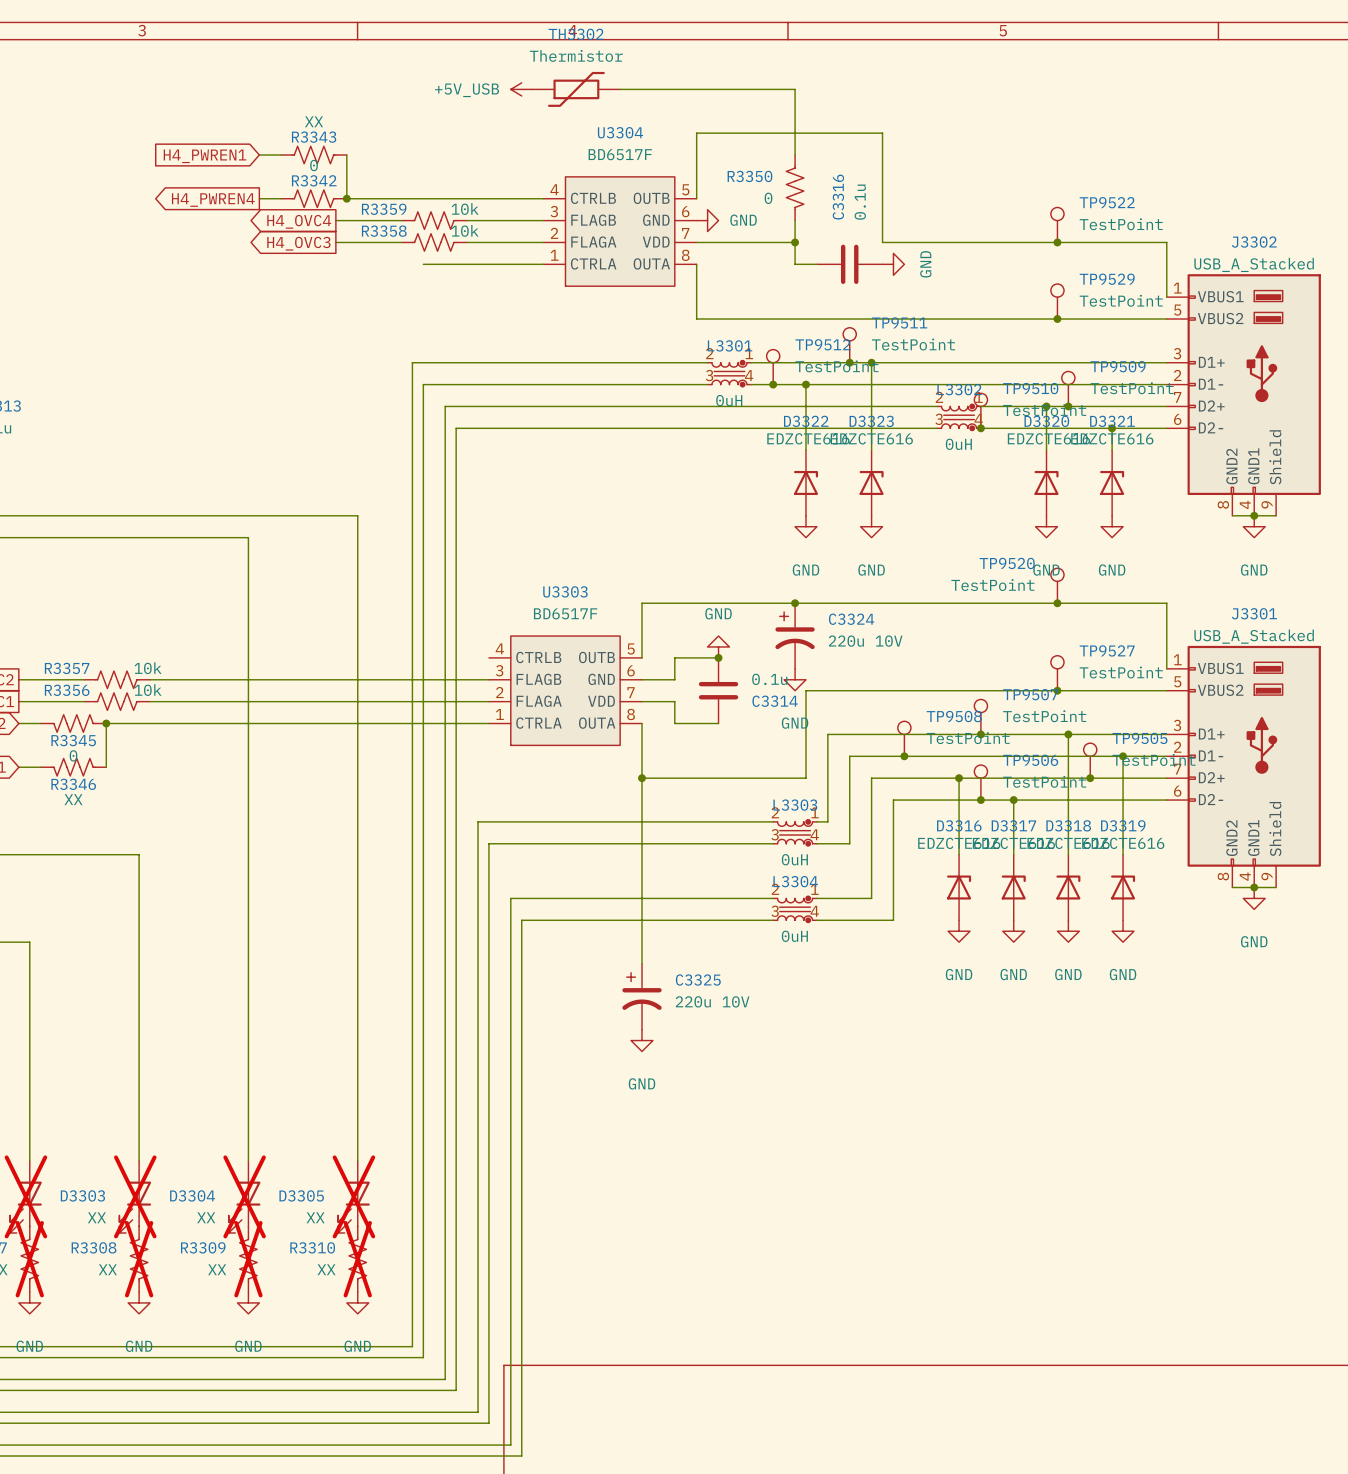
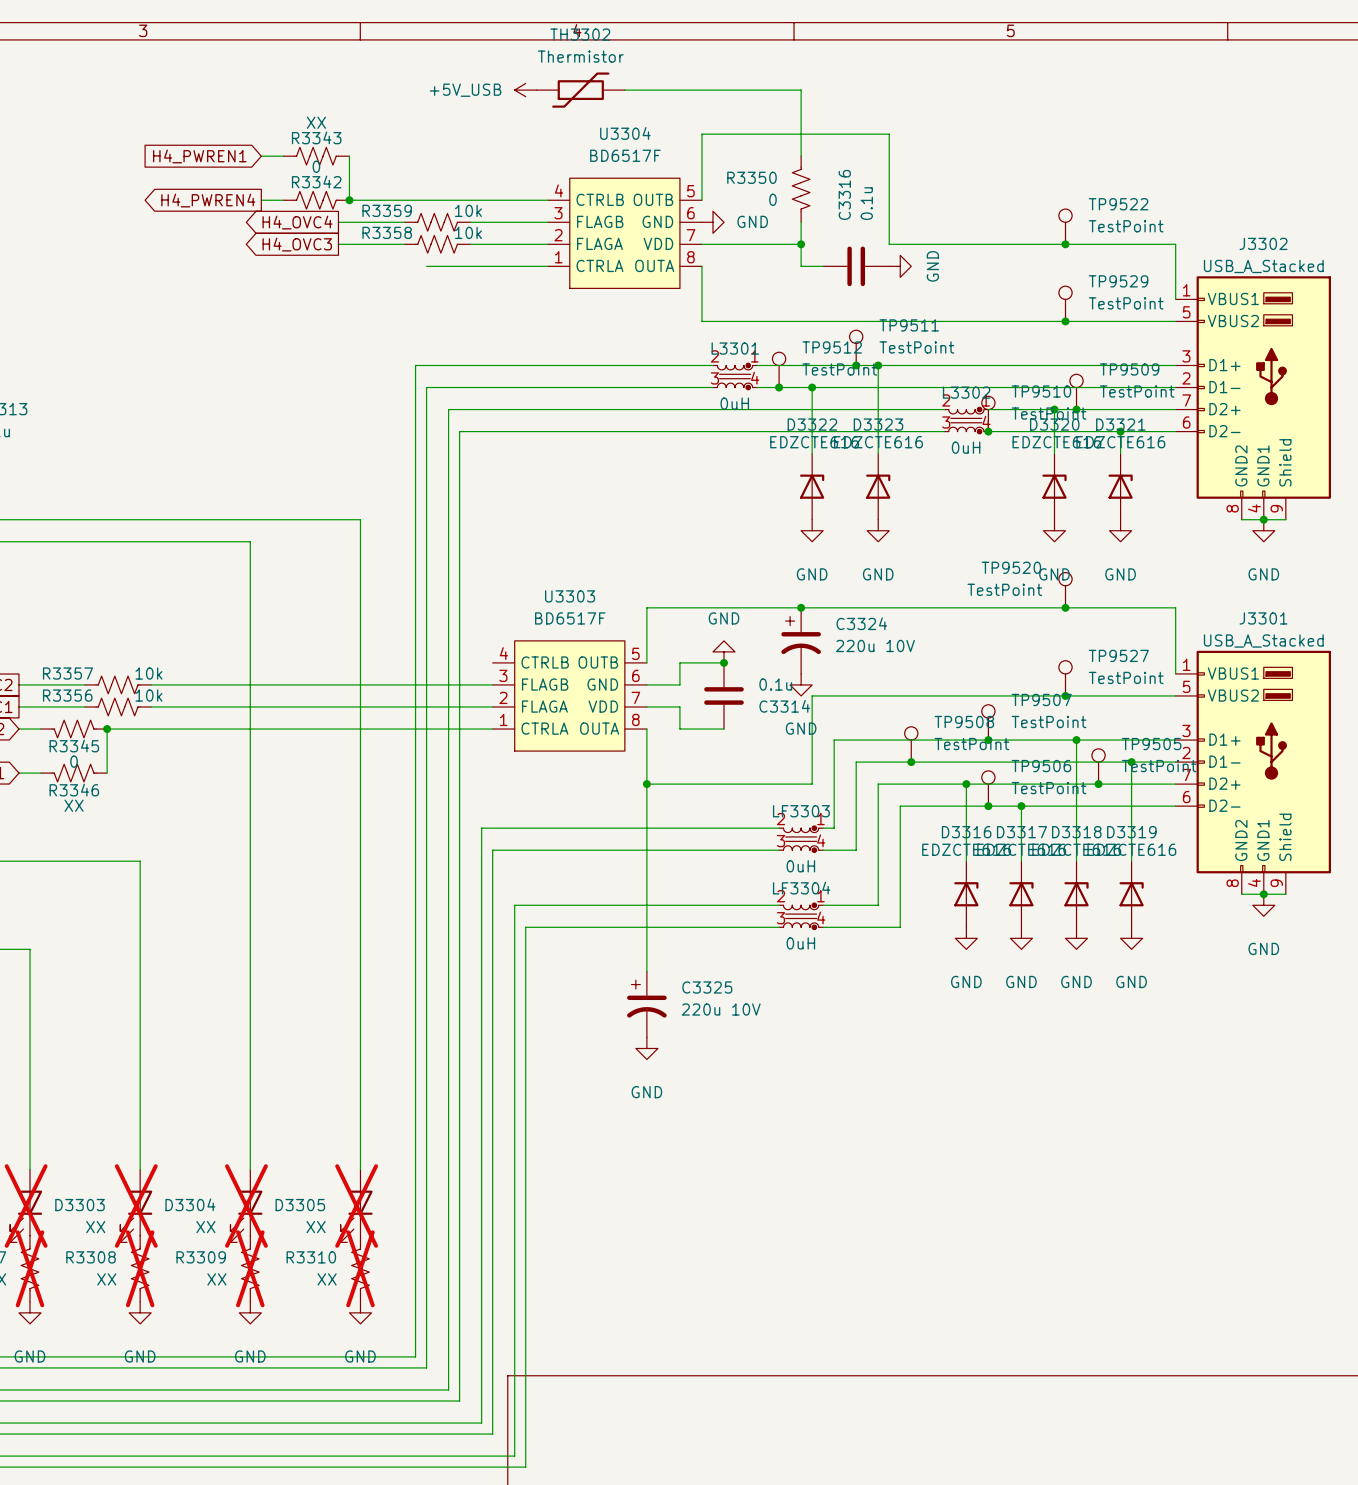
L3303 name: L3303 (795, 805) -> LF3303 (801, 811)
L3304 name: L3304 (795, 881) -> LF3304 (801, 888)

